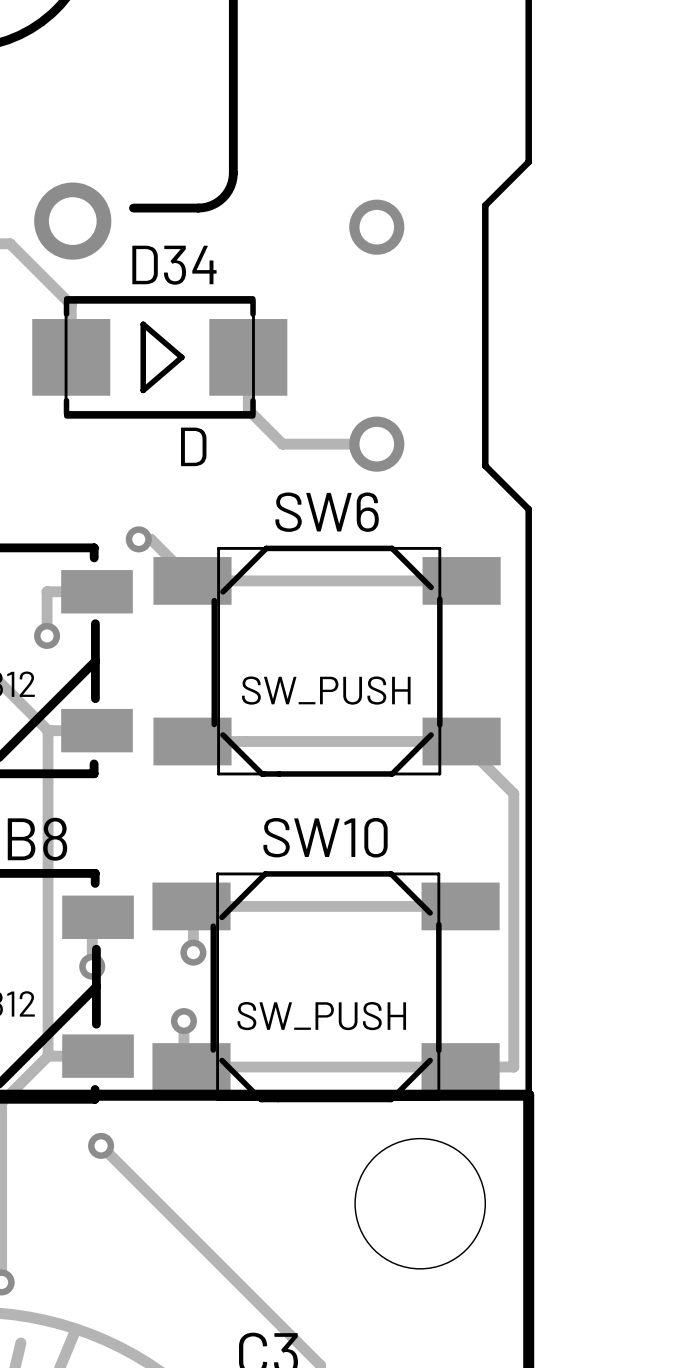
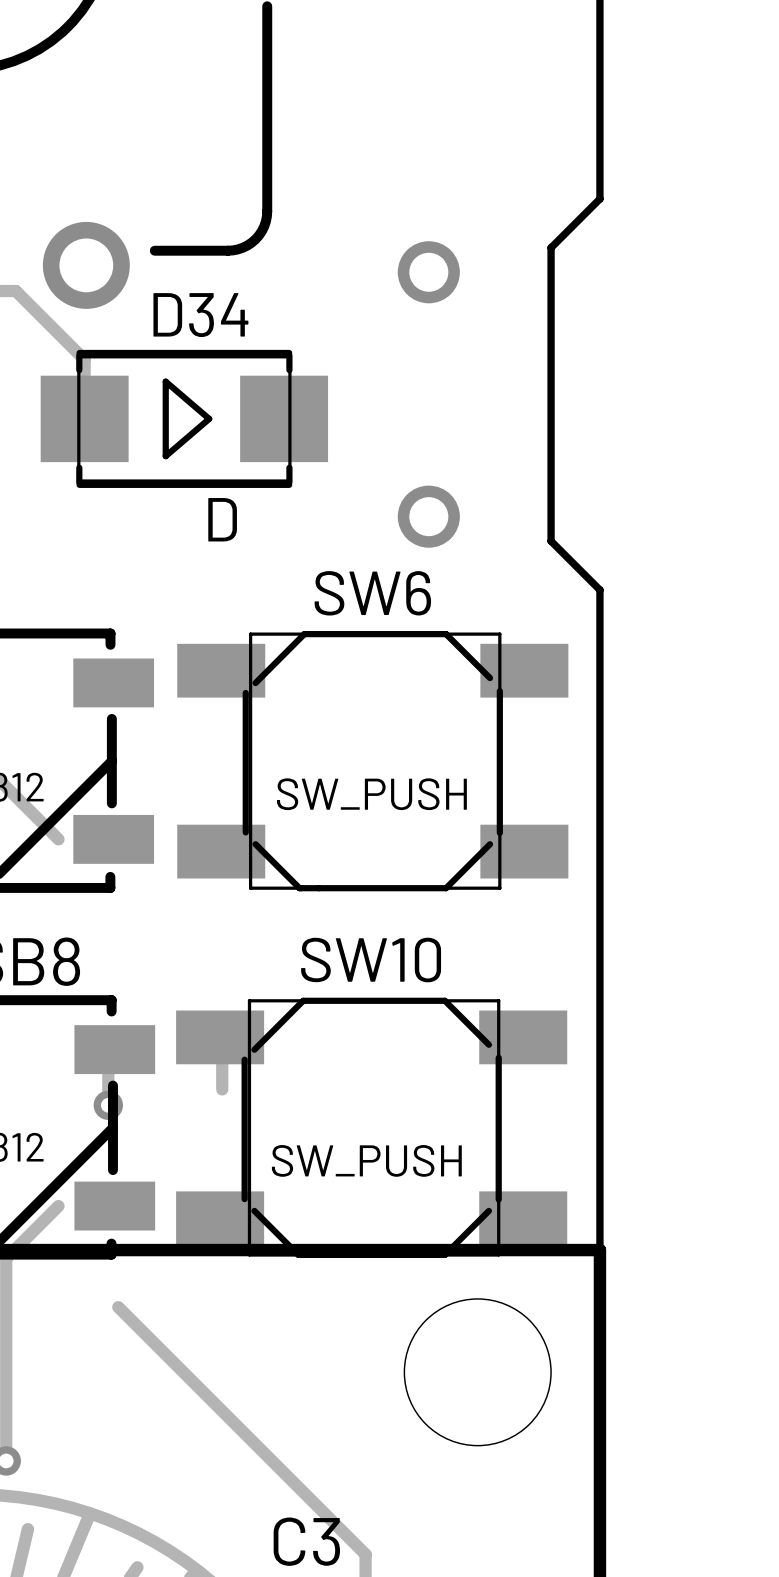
track: (248, 357) (248, 409) (282, 444) (376, 444) -> none
track: (138, 539) (150, 539) (192, 580) (461, 580) -> none
via: (138, 539) -> none
track: (97, 591) (47, 591) (47, 635) -> none
via: (47, 635) -> none
track: (97, 730) (48, 730) (48, 1056) (98, 1056) -> none
track: (192, 741) (461, 741) (513, 793) (513, 1067) (191, 1067) (183, 1059) (183, 1021) -> none
track: (191, 906) (460, 906) -> none
via: (193, 952) -> none
via: (183, 1021) -> none
via: (101, 1145) -> none

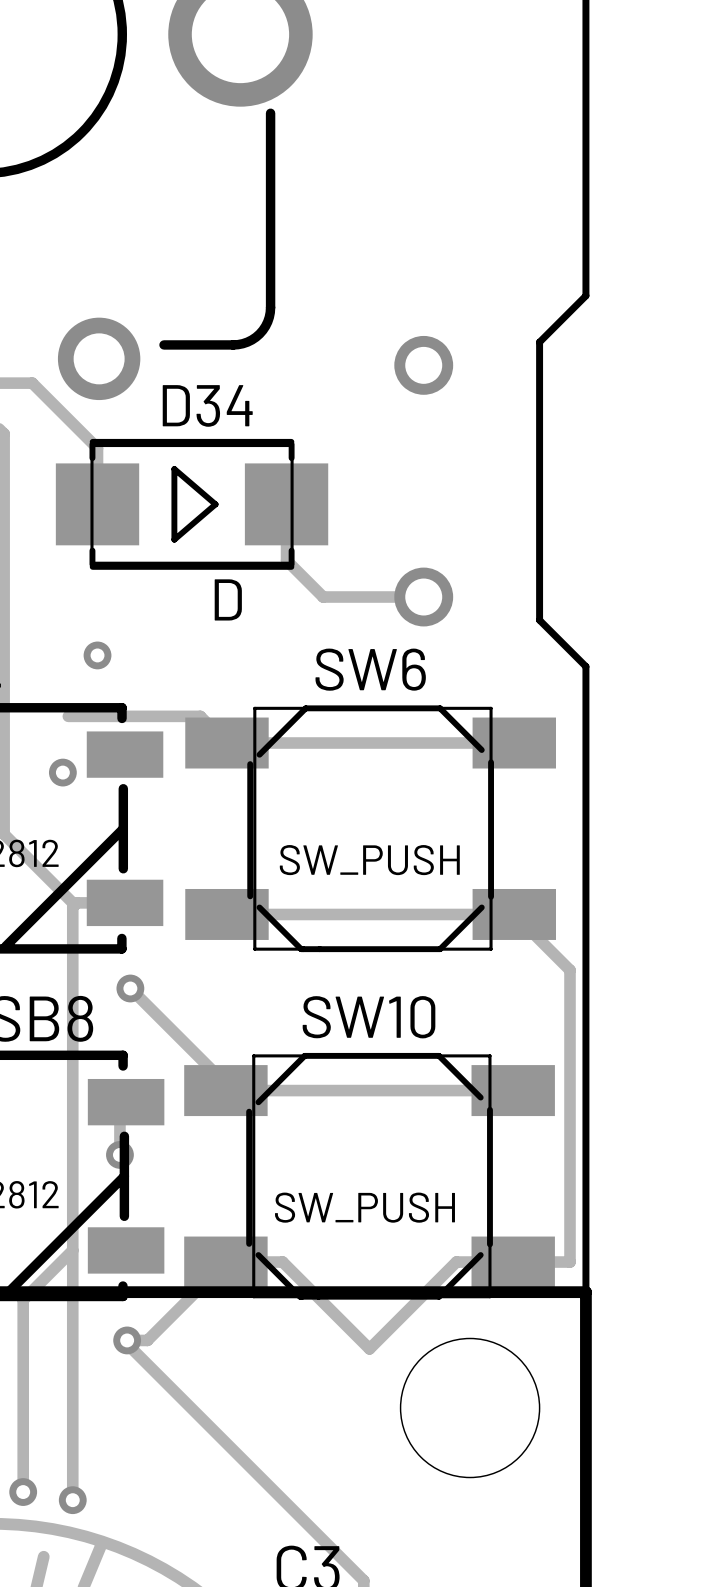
track: none -> (286, 504) (286, 560) (323, 597) (423, 597)
via: none -> (97, 655)
track: none -> (68, 716) (200, 716) (226, 743) (514, 743)
via: none -> (62, 772)
track: none -> (125, 902) (76, 902) (72, 907) (72, 1500)
track: none -> (226, 914) (514, 914) (570, 970) (570, 1262) (456, 1262) (369, 1348) (282, 1262) (225, 1262) (147, 1340) (127, 1340)
track: none -> (130, 988) (225, 1084) (225, 1090) (513, 1090)
via: none -> (130, 988)
track: (222, 1037) (222, 1089) -> none
via: none -> (127, 1340)
via: none -> (72, 1500)

